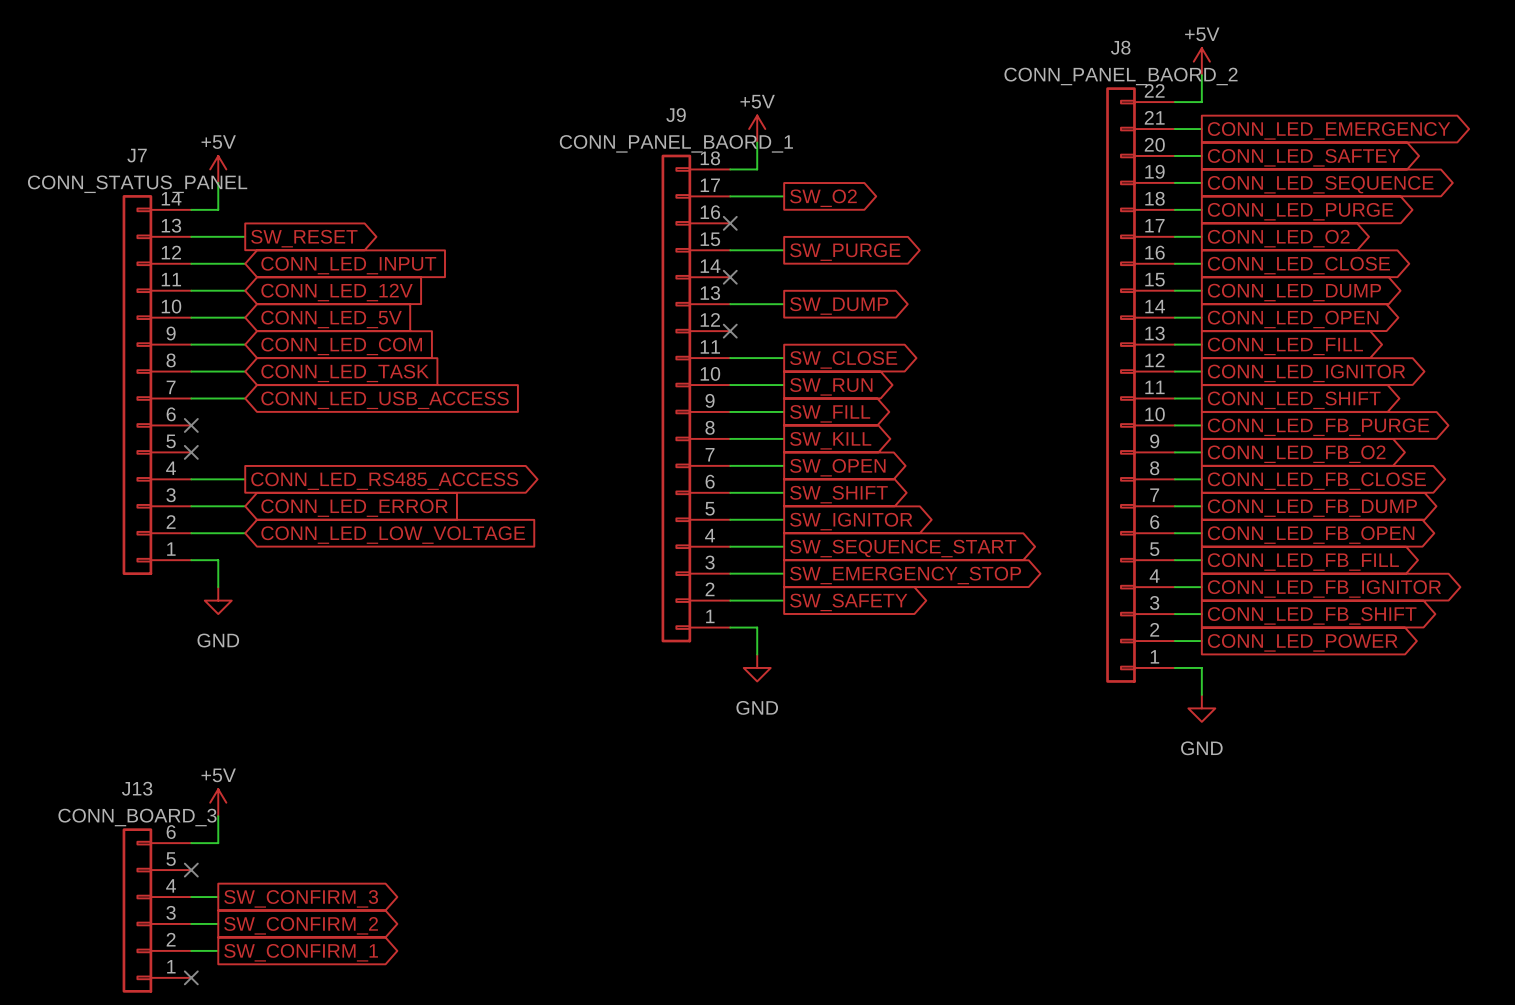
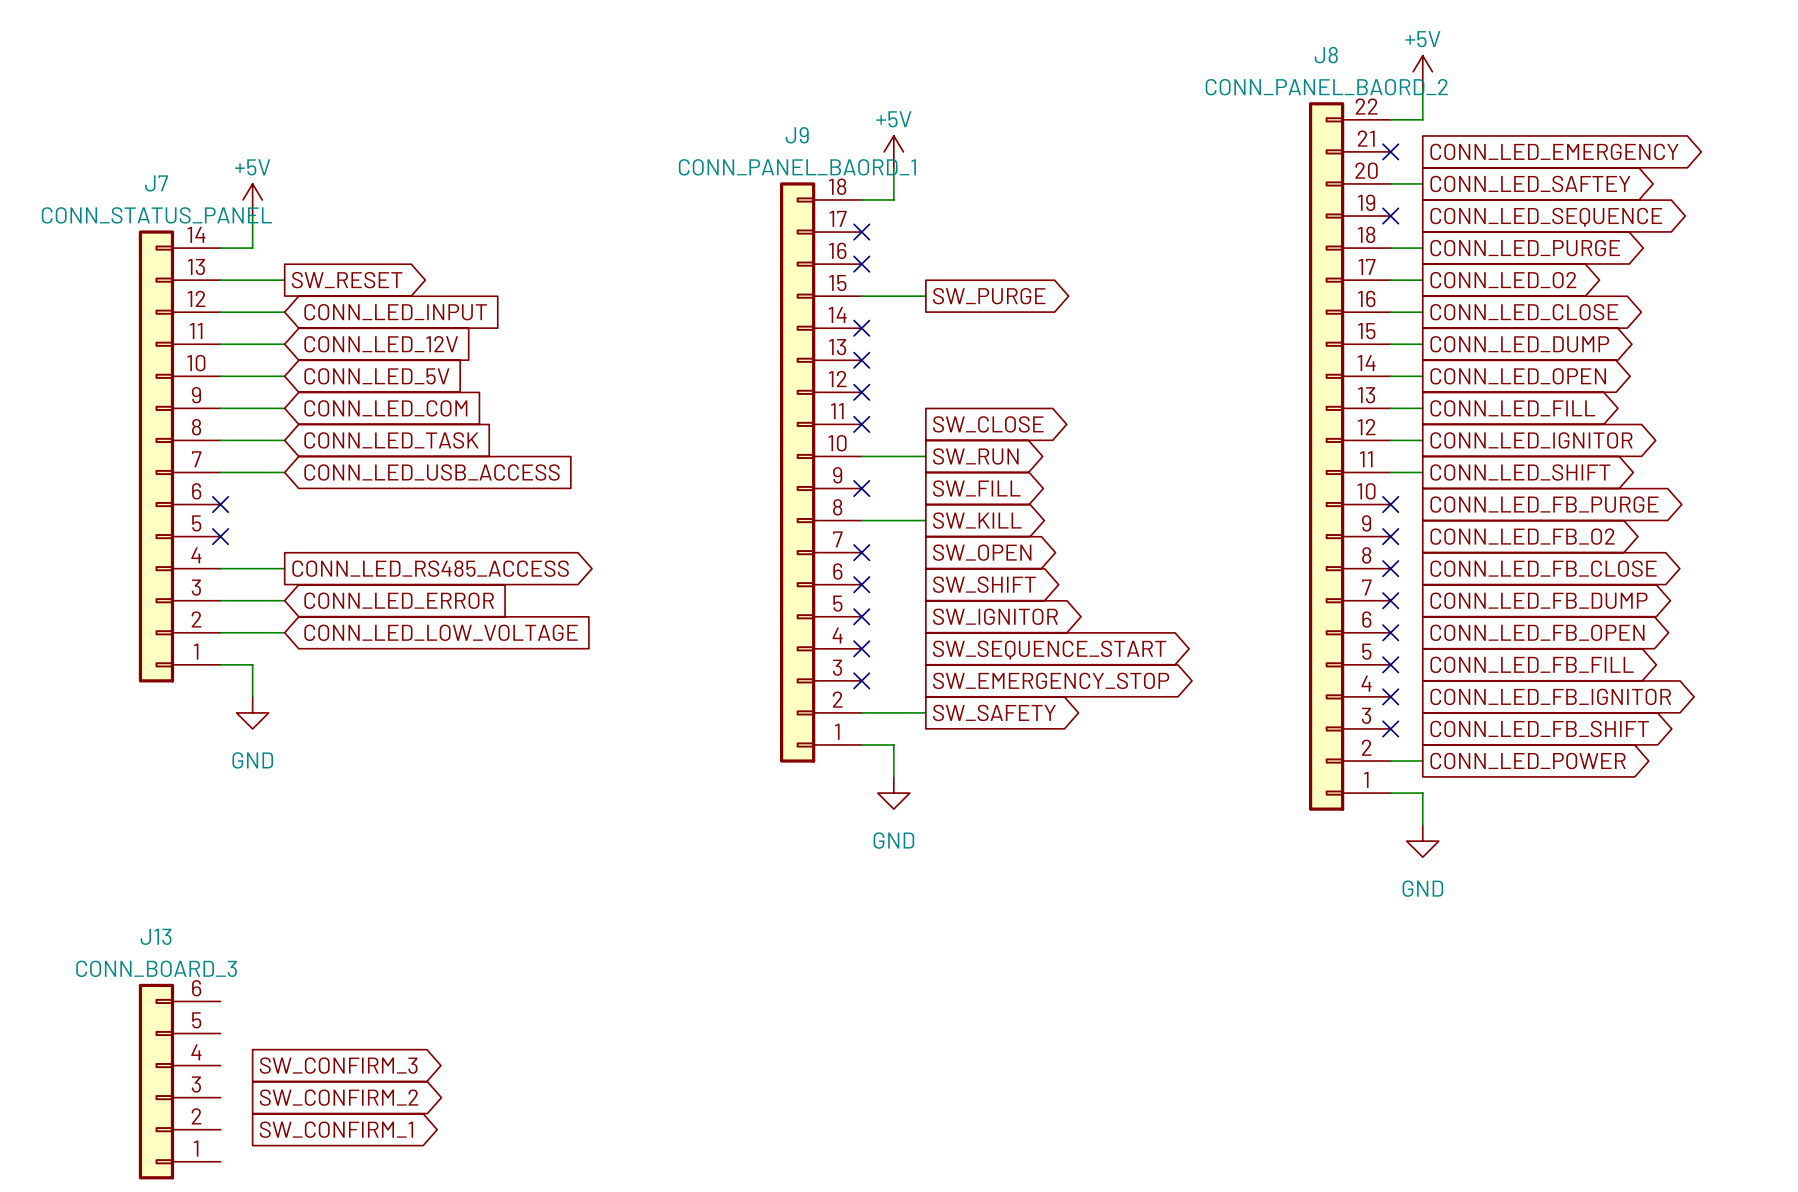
wire: (1174, 129) (1201, 129) -> none
no-connect mark: none -> (1390, 151)
wire: (1174, 182) (1201, 182) -> none
no-connect mark: none -> (1390, 216)
wire: (730, 196) (784, 196) -> none
no-connect mark: none -> (861, 232)
global label: SW_O2 (823, 198) -> none
wire: (730, 304) (784, 304) -> none
no-connect mark: none -> (861, 360)
global label: SW_DUMP (839, 306) -> none
wire: (730, 358) (784, 358) -> none
no-connect mark: none -> (861, 424)
wire: (730, 411) (784, 411) -> none
no-connect mark: none -> (861, 488)
wire: (1174, 425) (1201, 425) -> none
no-connect mark: none -> (1390, 504)
wire: (1174, 452) (1201, 452) -> none
no-connect mark: none -> (1390, 536)
wire: (730, 465) (784, 465) -> none
no-connect mark: none -> (861, 552)
wire: (1174, 479) (1201, 479) -> none
no-connect mark: none -> (1390, 568)
wire: (730, 492) (784, 492) -> none
no-connect mark: none -> (861, 584)
wire: (1174, 506) (1201, 506) -> none
no-connect mark: none -> (1390, 600)
wire: (730, 519) (784, 519) -> none
no-connect mark: none -> (861, 616)
wire: (1174, 533) (1201, 533) -> none
no-connect mark: none -> (1390, 632)
wire: (730, 546) (784, 546) -> none
no-connect mark: none -> (861, 648)
wire: (1174, 560) (1201, 560) -> none
no-connect mark: none -> (1390, 664)
wire: (730, 573) (784, 573) -> none
no-connect mark: none -> (861, 680)
wire: (1174, 587) (1201, 587) -> none
no-connect mark: none -> (1390, 696)
wire: (1174, 614) (1201, 614) -> none
no-connect mark: none -> (1390, 728)
power symbol: +5V (218, 802) -> none
wire: (218, 816) (218, 843) (191, 843) -> none
no-connect mark: (191, 870) -> none
wire: (191, 897) (218, 897) -> none
wire: (191, 923) (218, 923) -> none
wire: (191, 950) (218, 950) -> none
no-connect mark: (191, 977) -> none

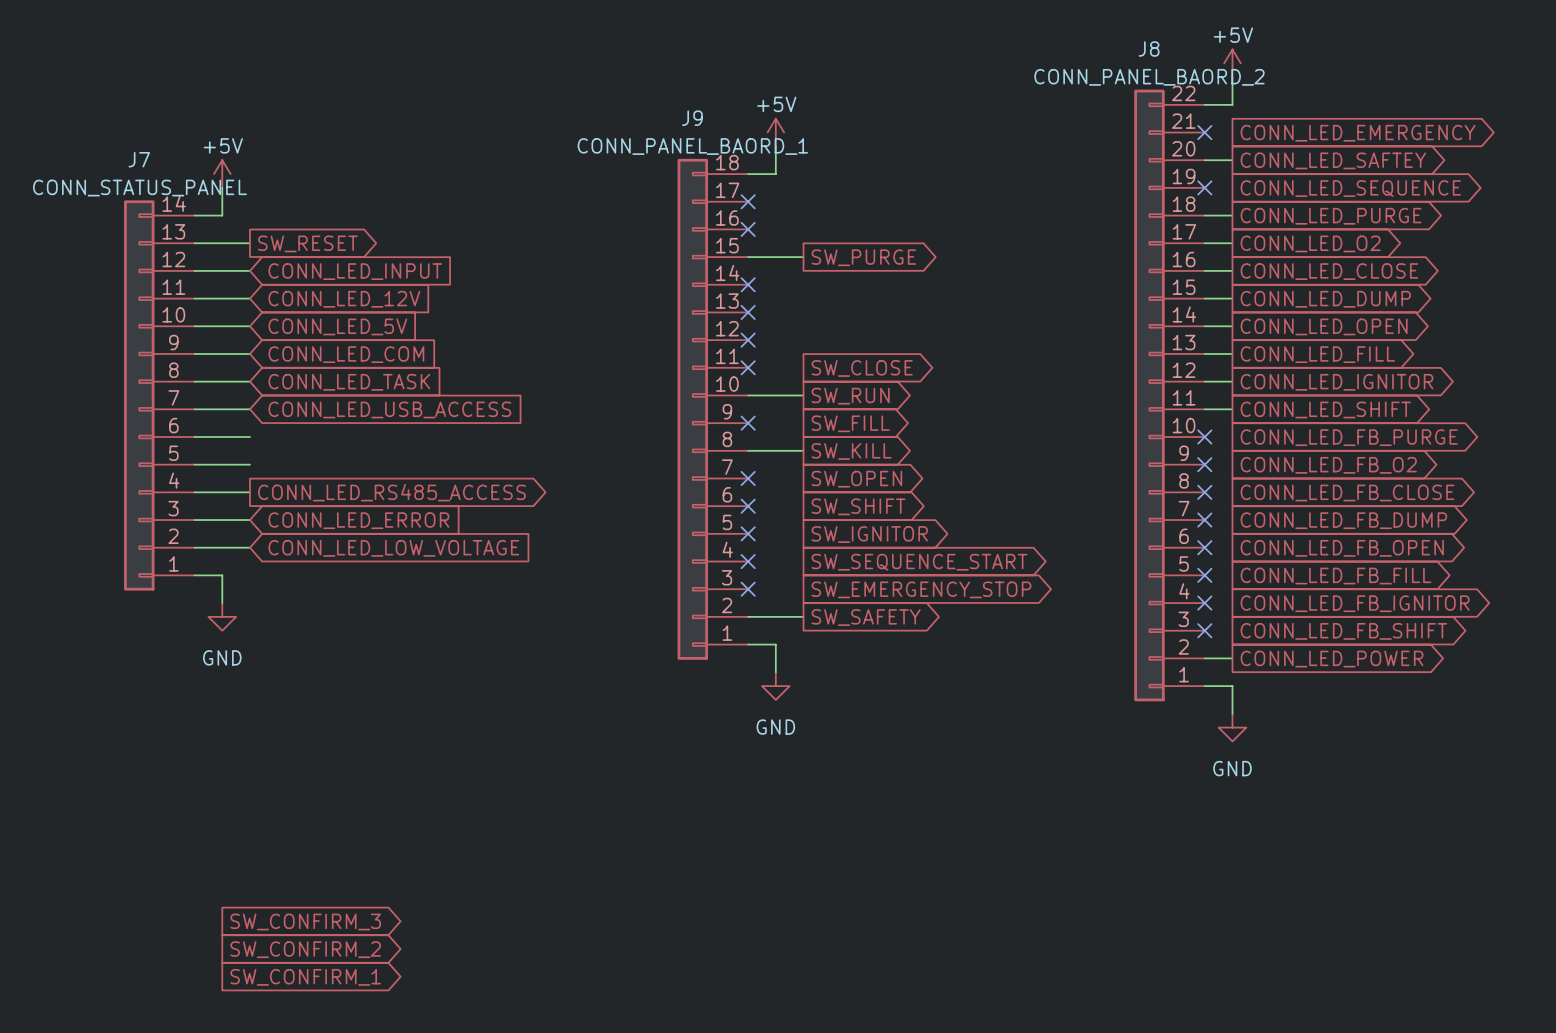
wire: none -> (194, 436) (249, 436)
no-connect mark: (220, 504) -> none
wire: none -> (194, 464) (249, 464)
no-connect mark: (220, 536) -> none
J13: CONN_BOARD_3 (179, 1081) -> none

